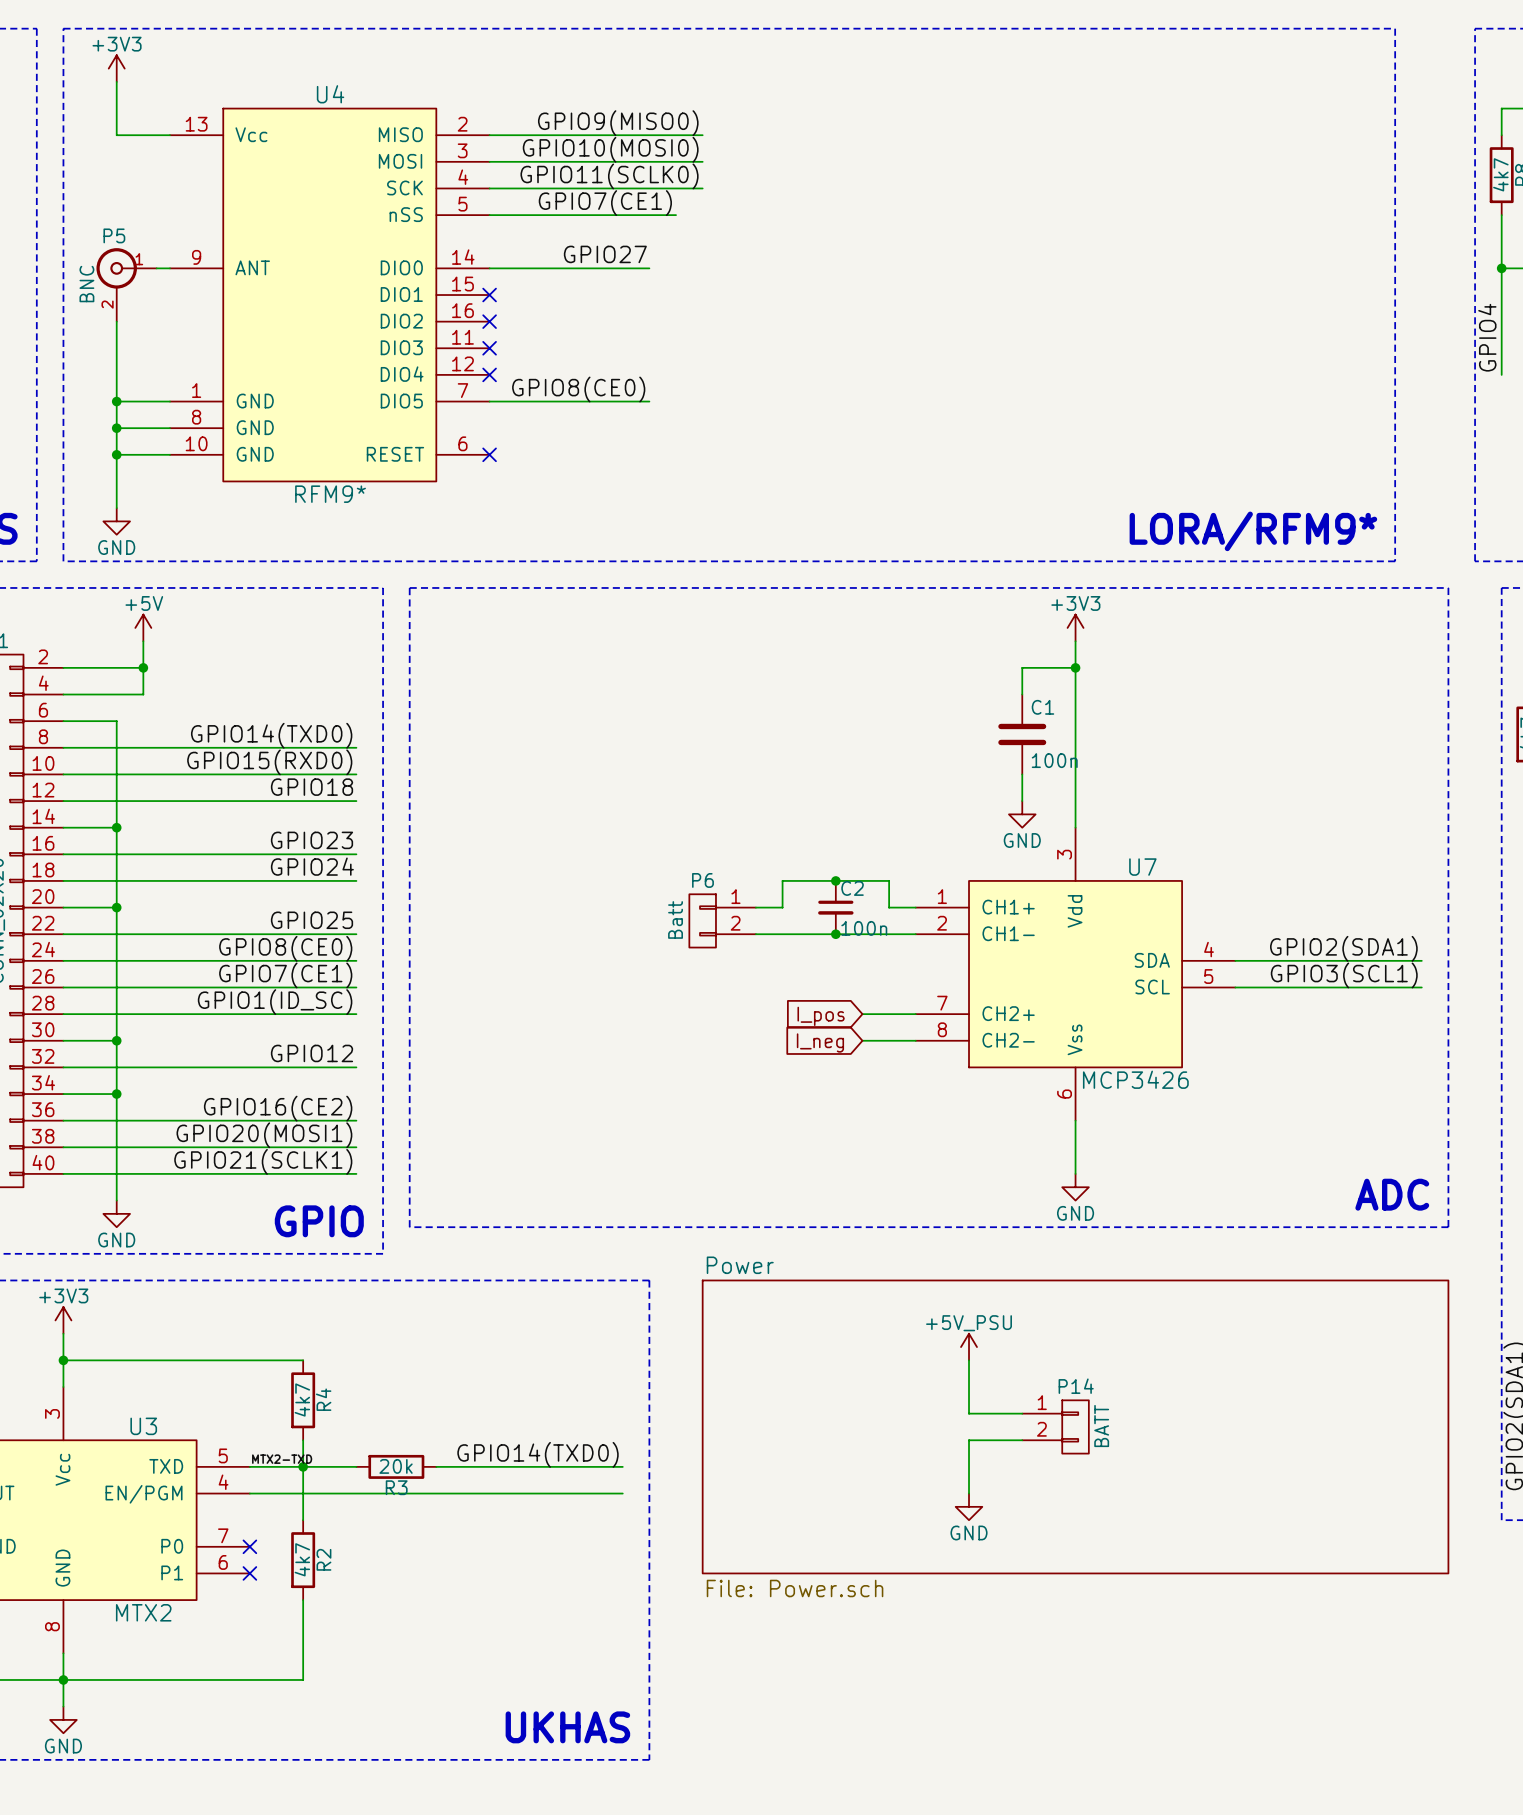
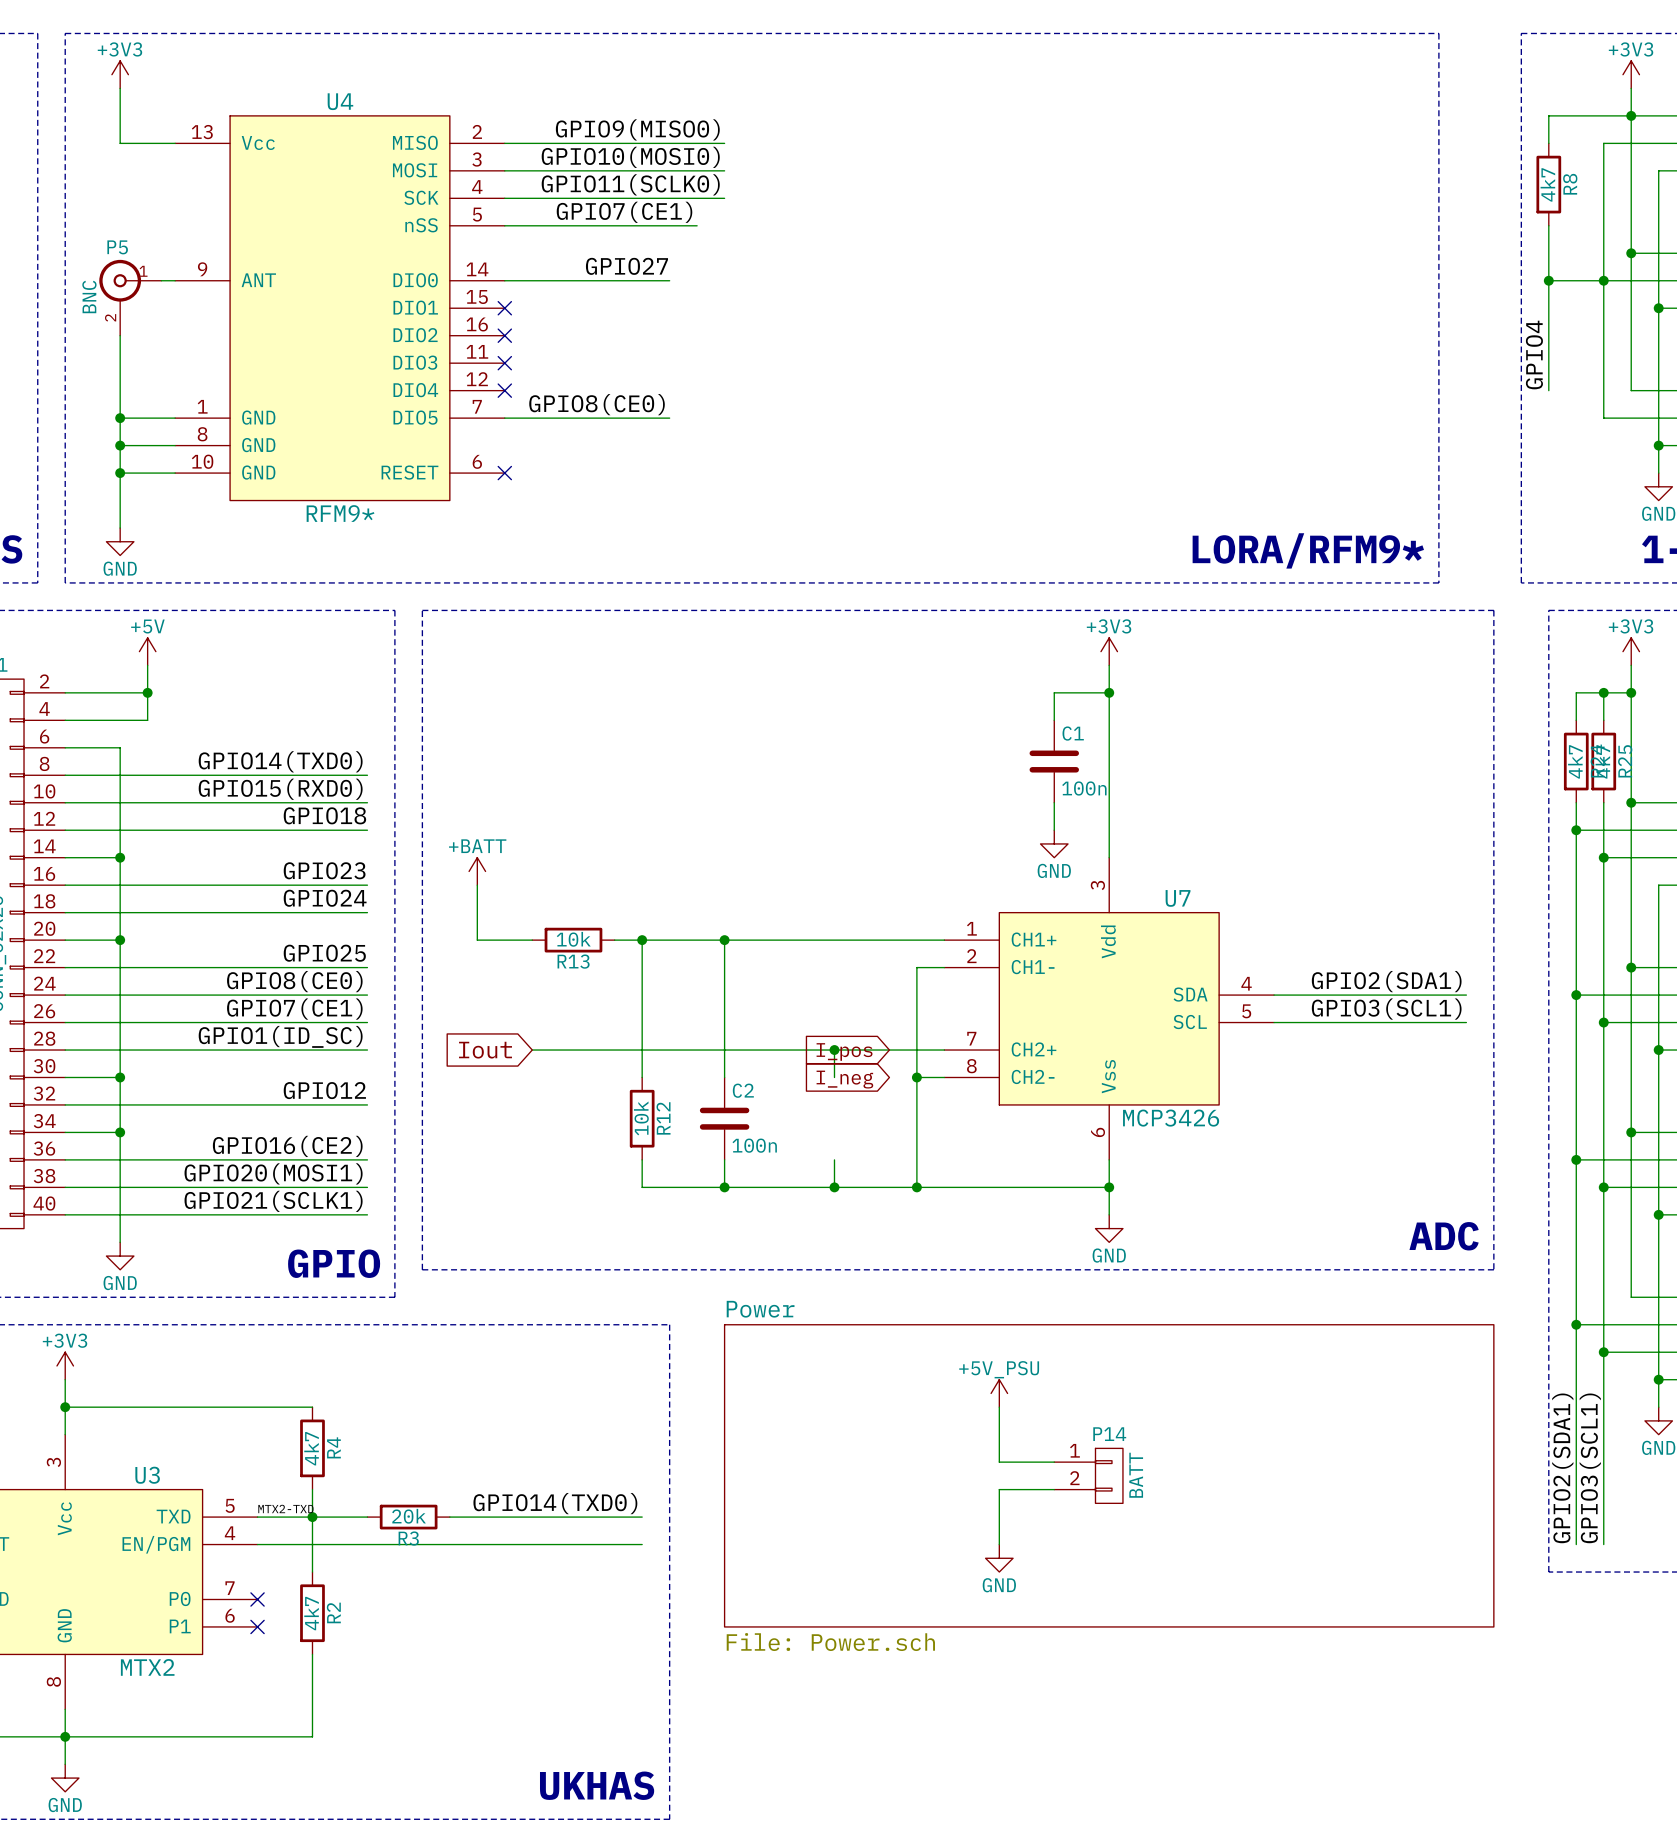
power symbol: none -> +BATT (477, 871)
wire: none -> (477, 885) (477, 940) (532, 940)
C2 symbol: [818, 880, 854, 935] -> [699, 1077, 750, 1160]
junction: (835, 880) -> none
R13: none -> 10k (573, 940)
wire: none -> (614, 940) (779, 940)
wire: none -> (642, 940) (642, 1077)
junction: none -> (642, 940)
wire: none -> (724, 940) (724, 1077)
junction: none -> (724, 940)
wire: (782, 907) (782, 880) (889, 880) (889, 907) -> (807, 940) (916, 940)
P6: Batt (722, 920) -> none
wire: (755, 934) (889, 934) -> (916, 1187) (916, 967)
junction: (835, 934) -> none
global label: none -> Iout (485, 1050)
wire: none -> (532, 1050) (889, 1050)
wire: none -> (834, 1050) (834, 1077)
junction: none -> (834, 1050)
wire: (862, 1040) (889, 1040) -> none
junction: none -> (916, 1077)
R12: none -> 10k (642, 1118)
wire: none -> (642, 1159) (642, 1187) (1109, 1187)
wire: none -> (724, 1159) (724, 1187)
wire: none -> (834, 1159) (834, 1187)
junction: none -> (724, 1187)
junction: none -> (834, 1187)
junction: none -> (916, 1187)
junction: none -> (1109, 1187)

